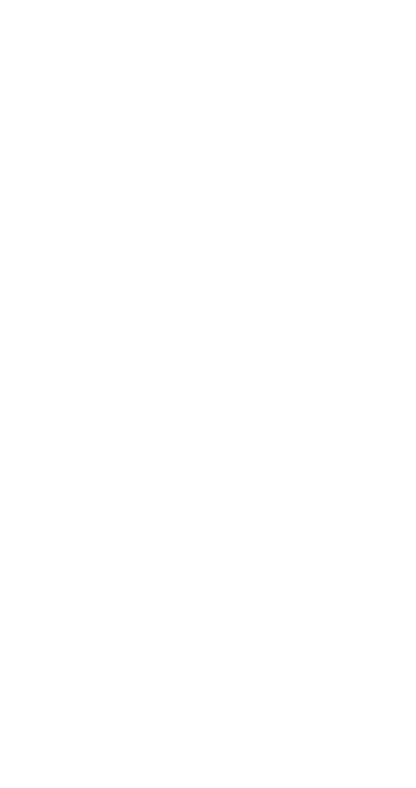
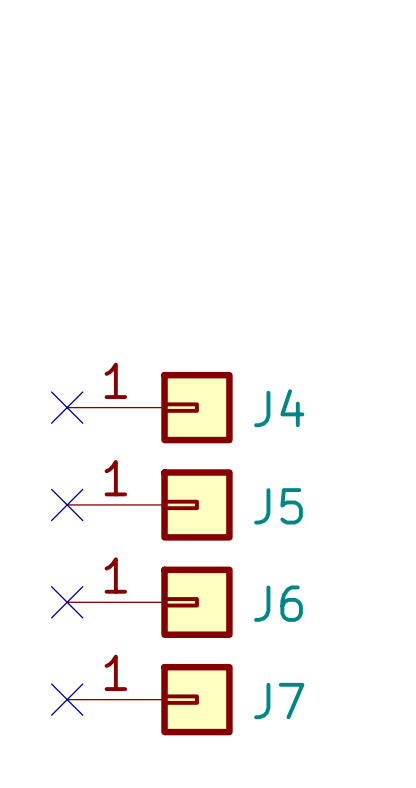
no-connect mark: none -> (67, 407)
J4: none -> (149, 407)
no-connect mark: none -> (67, 504)
J5: none -> (149, 504)
no-connect mark: none -> (67, 602)
J6: none -> (149, 602)
no-connect mark: none -> (67, 699)
J7: none -> (149, 699)

